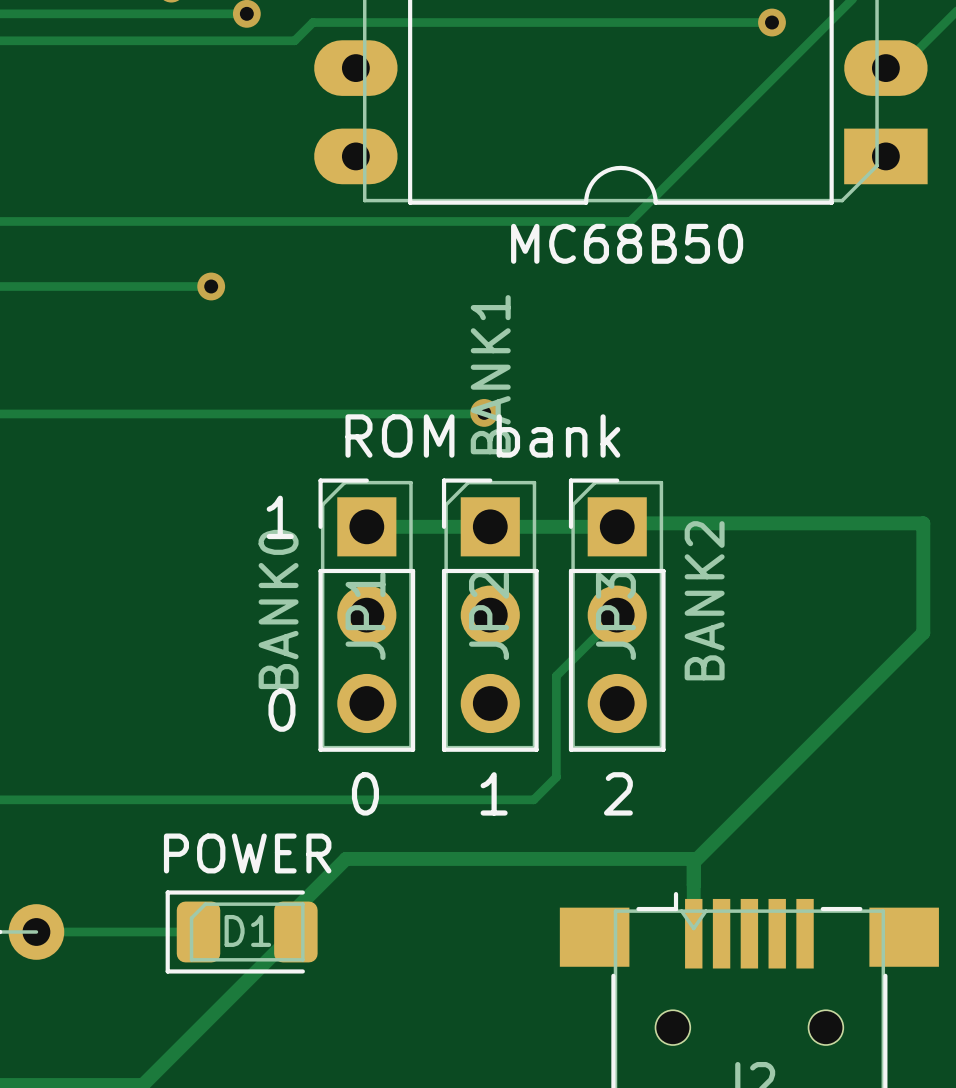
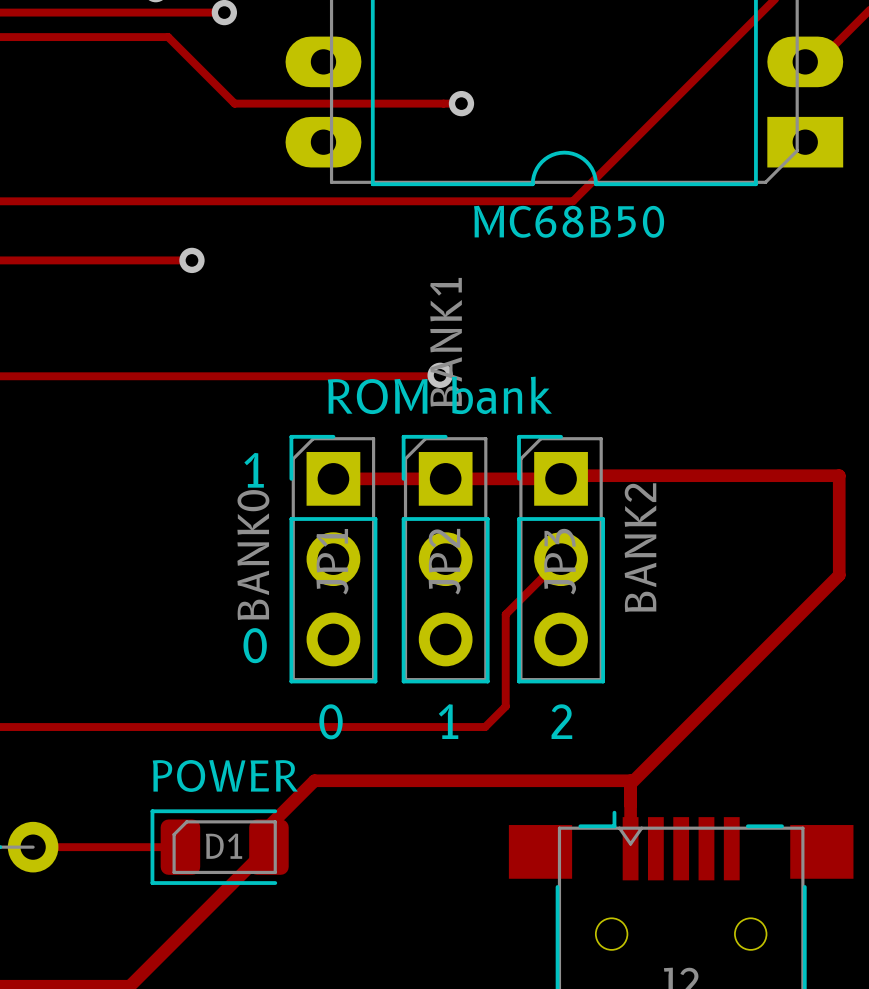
track: (772, 22) (312, 22) (294, 40) (184, 40) -> (461, 103) (234, 103) (168, 37)
via: (772, 22) -> none
via: none -> (461, 103)

